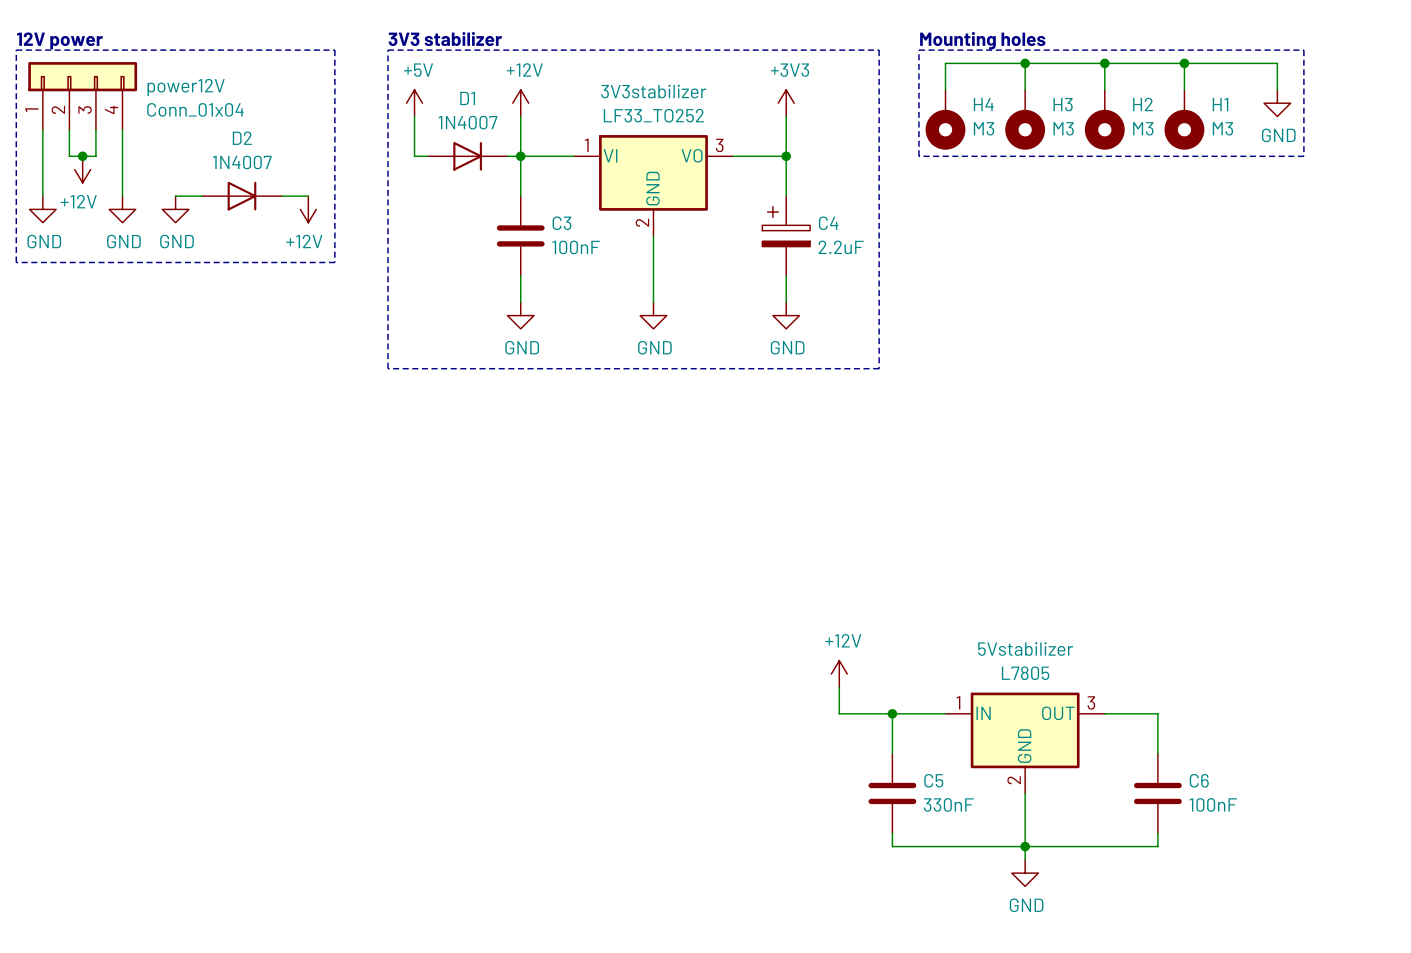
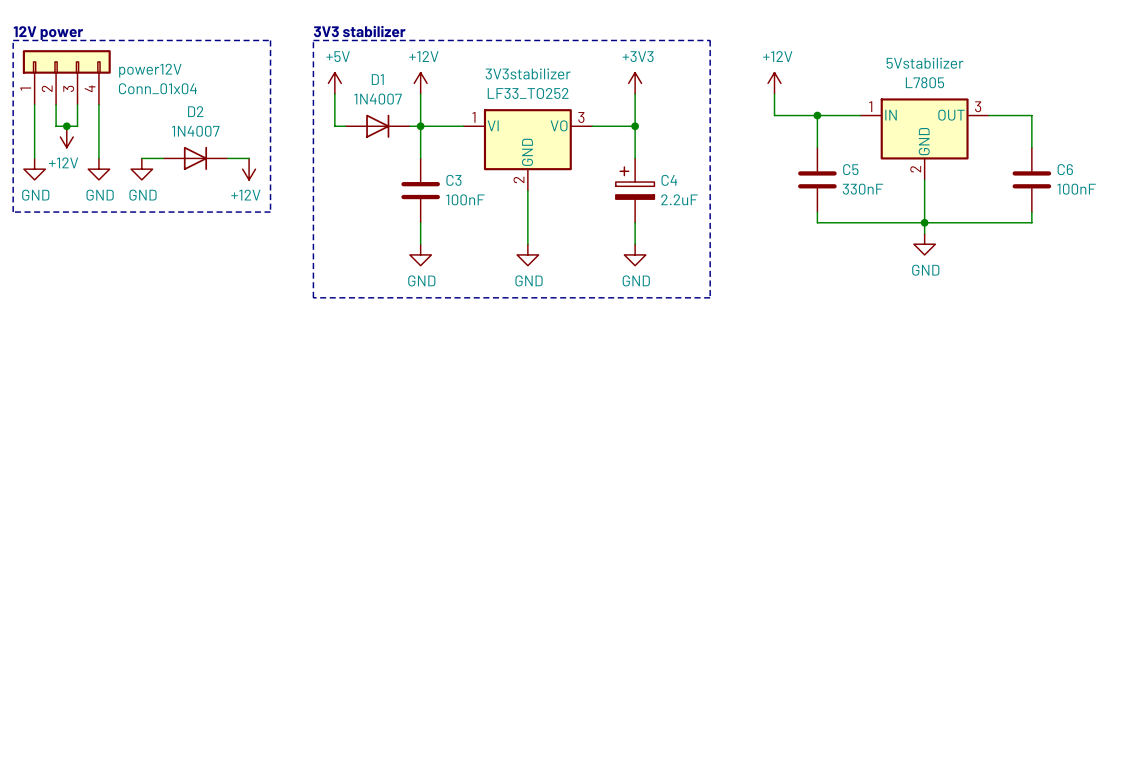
text: Mounting holes (982, 40) -> none
line: (918, 50) (918, 156) (1303, 156) (1303, 50) (918, 50) -> none
wire: (1025, 63) (1025, 89) -> none
junction: (1025, 63) -> none
wire: (1104, 63) (1104, 89) -> none
junction: (1104, 63) -> none
wire: (1184, 63) (1184, 89) -> none
junction: (1184, 63) -> none
wire: (945, 89) (945, 63) (1277, 63) (1277, 89) -> none
power symbol: none -> +12V (774, 83)
power symbol position: GND (1277, 103) -> GND (924, 244)
wire: none -> (774, 94) (774, 115) (860, 115)
H4: M3 (945, 119) -> none
H3: M3 (1025, 119) -> none
H2: M3 (1104, 119) -> none
H1: M3 (1184, 119) -> none
wire: none -> (817, 115) (817, 147)
junction: none -> (817, 115)
wire: none -> (988, 115) (1031, 115) (1031, 147)
wire: none -> (924, 179) (924, 233)
wire: none -> (817, 212) (817, 222) (1031, 222) (1031, 212)
junction: none -> (924, 222)
power symbol: +12V (839, 674) -> none
wire: (839, 687) (839, 713) (945, 713) -> none
wire: (892, 713) (892, 753) -> none
junction: (892, 713) -> none
wire: (1104, 713) (1157, 713) (1157, 753) -> none
5Vstabilizer position: (1025, 743) -> (924, 139)
C5 position: (892, 793) -> (817, 179)
wire: (1025, 793) (1025, 859) -> none
C6 position: (1157, 793) -> (1031, 179)
wire: (892, 833) (892, 846) (1157, 846) (1157, 833) -> none
junction: (1025, 846) -> none
power symbol: GND (1025, 873) -> none

